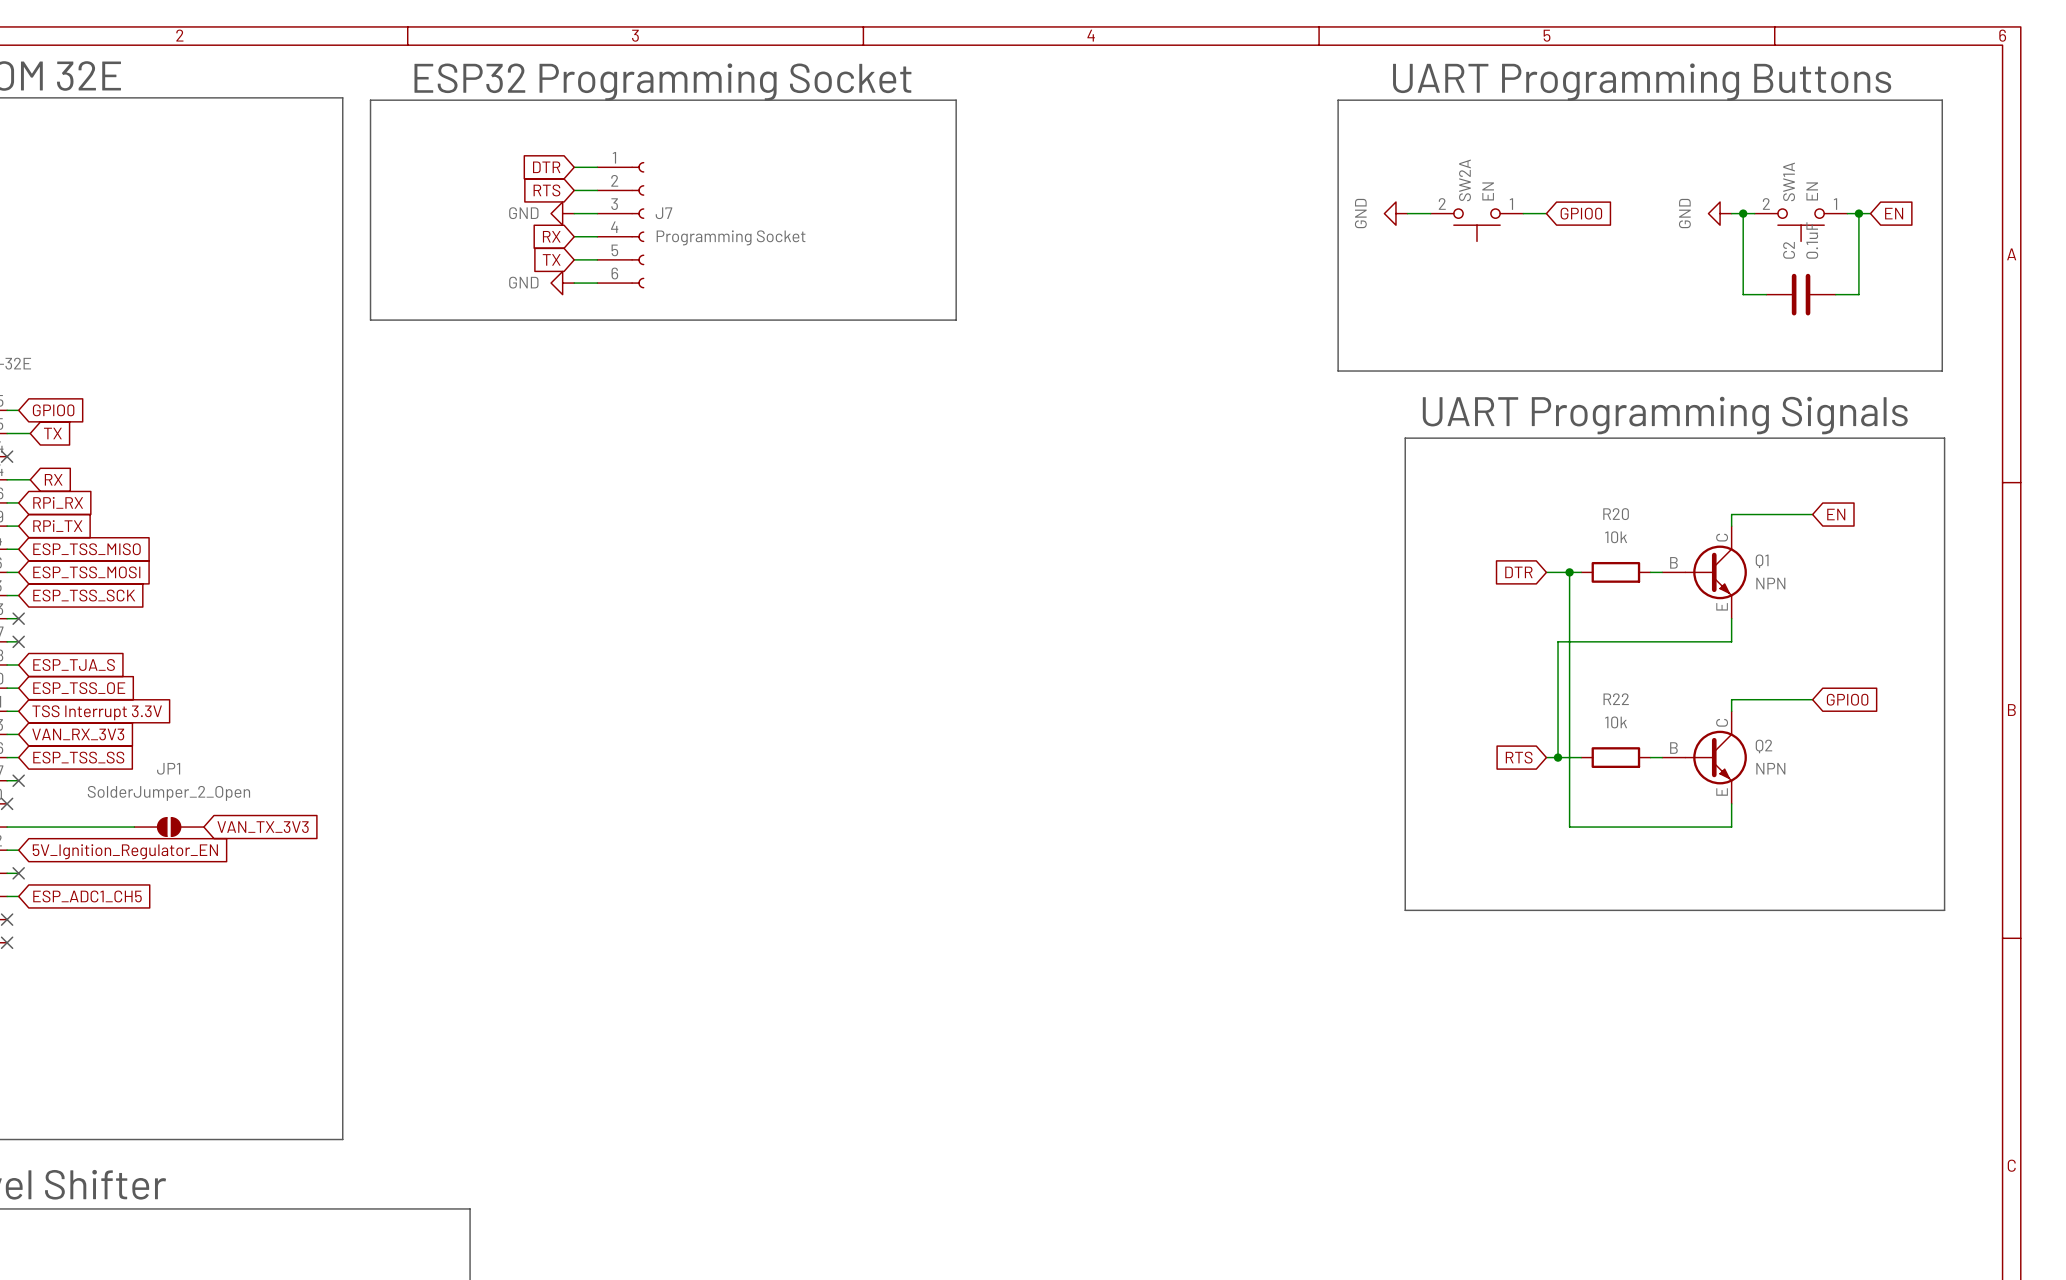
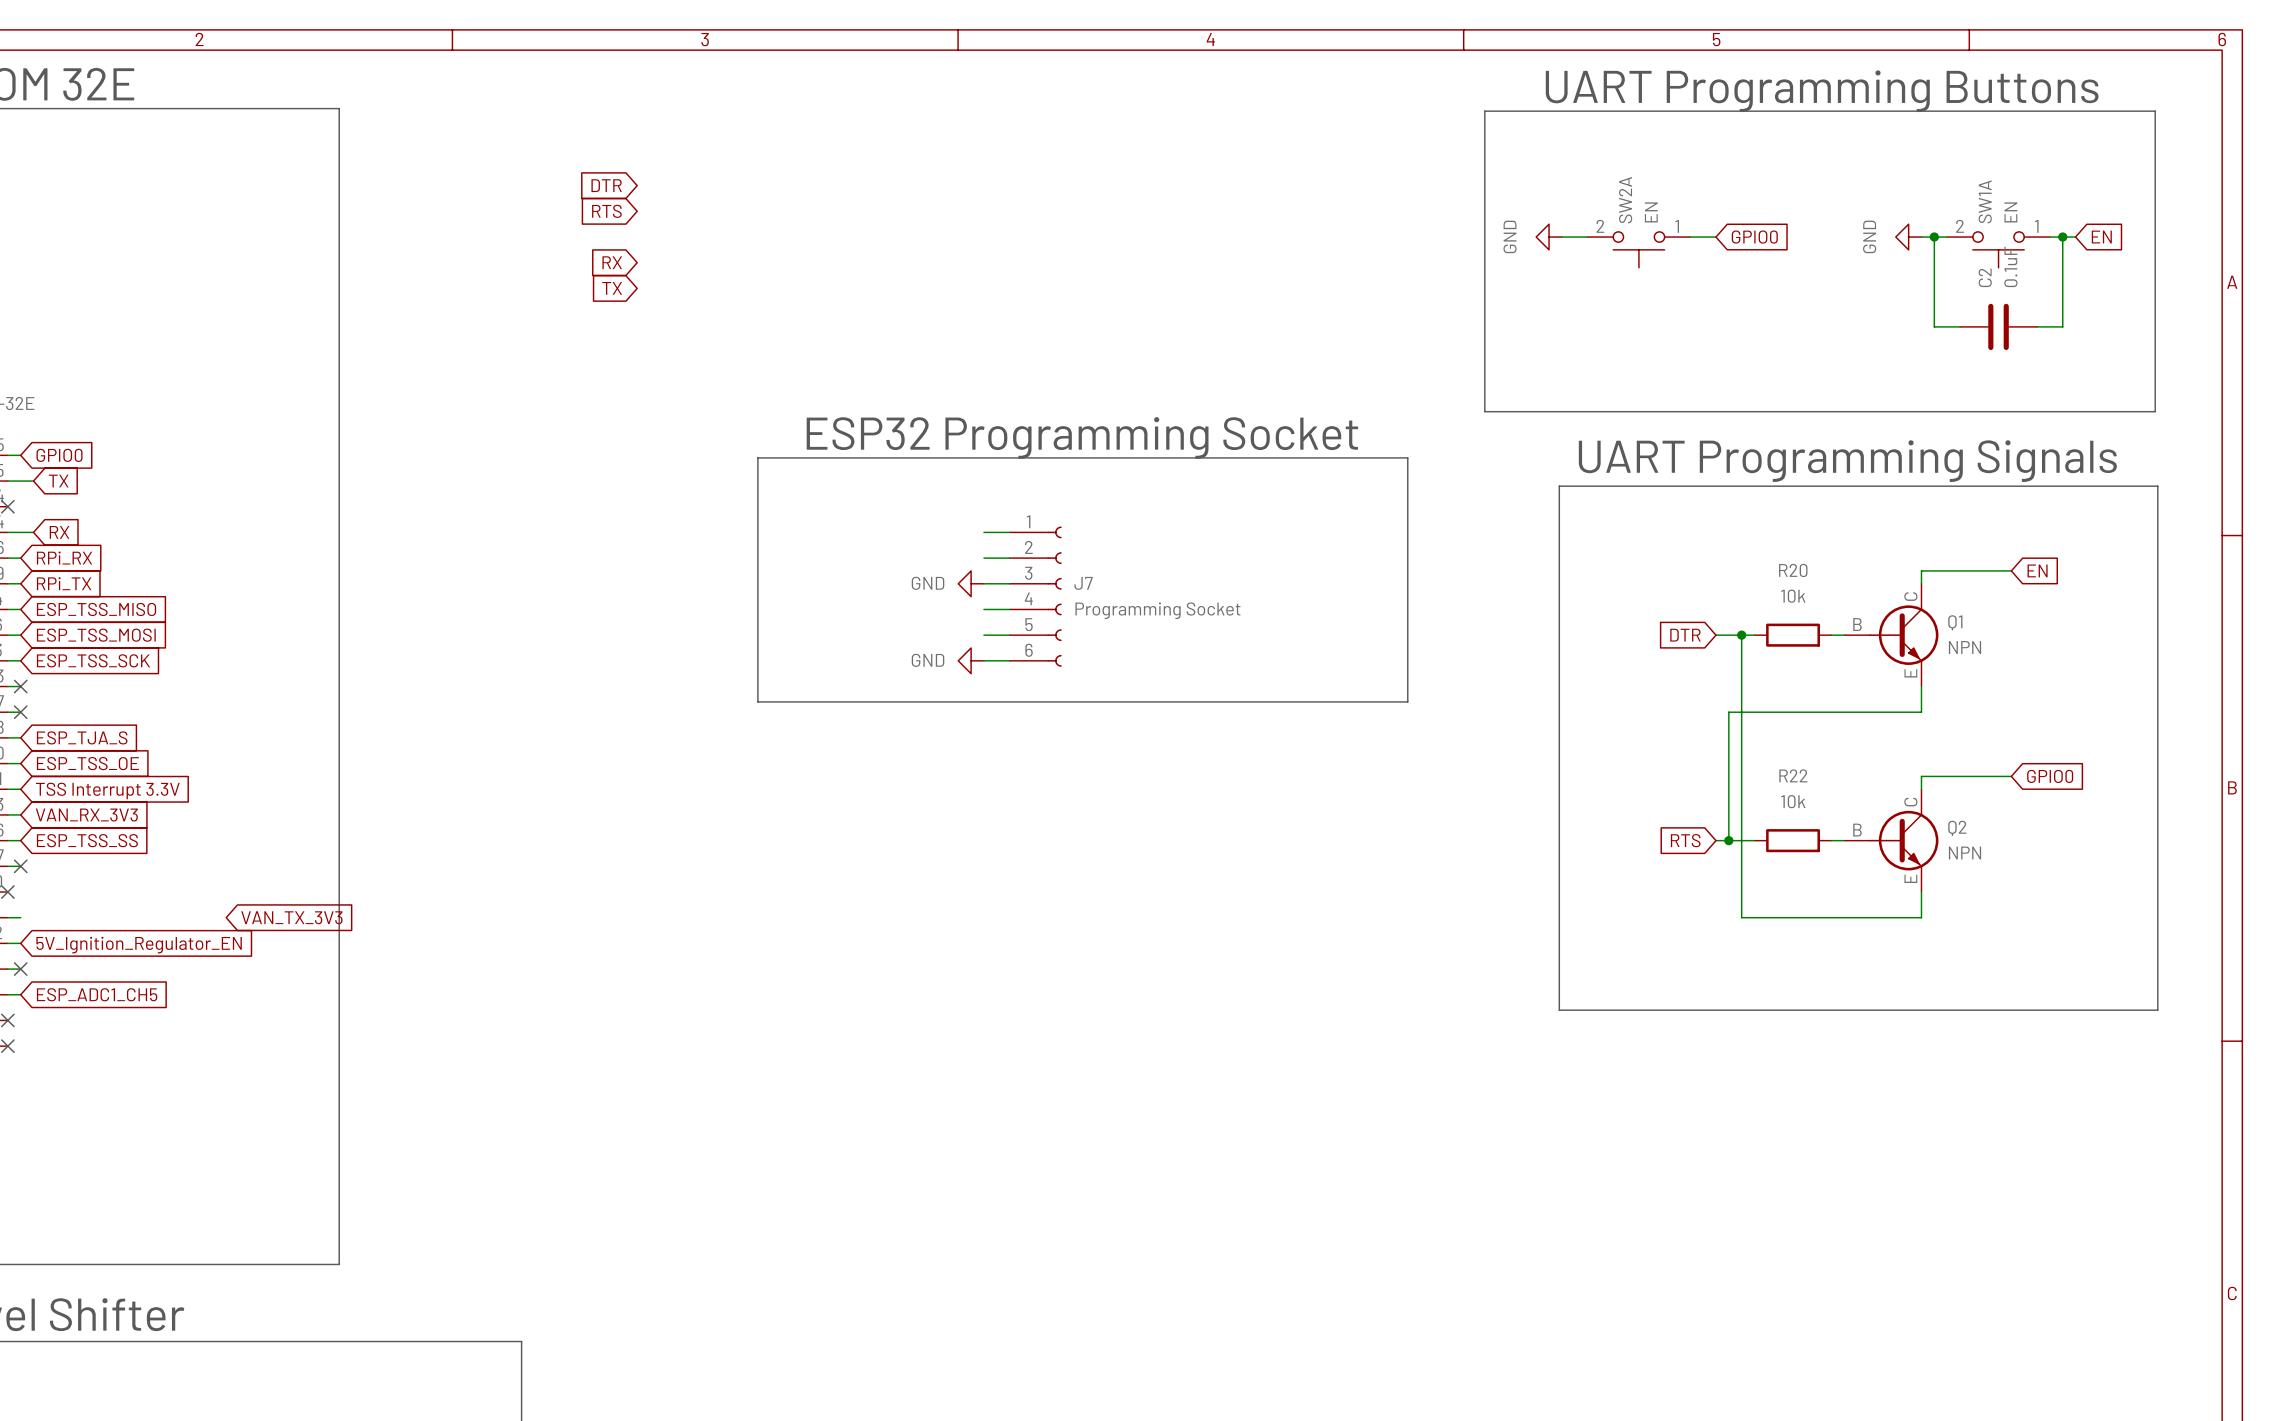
text: ESP32 Programming Socket (662, 82) -> none
line: (305, 97) (342, 97) (342, 1139) (305, 1139) -> (339, 108) (339, 1264)
line: (370, 100) (956, 100) (956, 320) (370, 320) (370, 100) -> none
wire: (574, 167) (597, 167) -> none
wire: (574, 190) (597, 190) -> none
power symbol: GND (562, 213) -> none
wire: (574, 213) (597, 213) -> none
J7 position: (620, 225) -> (1035, 596)
wire: (574, 236) (597, 236) -> none
wire: (574, 259) (597, 259) -> none
power symbol: GND (562, 283) -> none
wire: (574, 283) (597, 283) -> none
text: none -> ESP32 Programming Socket (1082, 437)
line: none -> (757, 457) (1407, 457) (1407, 701) (757, 701) (757, 457)
wire: none -> (983, 532) (1009, 532)
wire: none -> (983, 558) (1009, 558)
power symbol: none -> GND (971, 583)
wire: none -> (983, 583) (1009, 583)
wire: none -> (983, 609) (1009, 609)
wire: none -> (983, 635) (1009, 635)
power symbol: none -> GND (971, 660)
wire: none -> (983, 660) (1009, 660)
wire: (18, 827) (134, 827) -> none
JP1: SolderJumper_2_Open (169, 827) -> none

